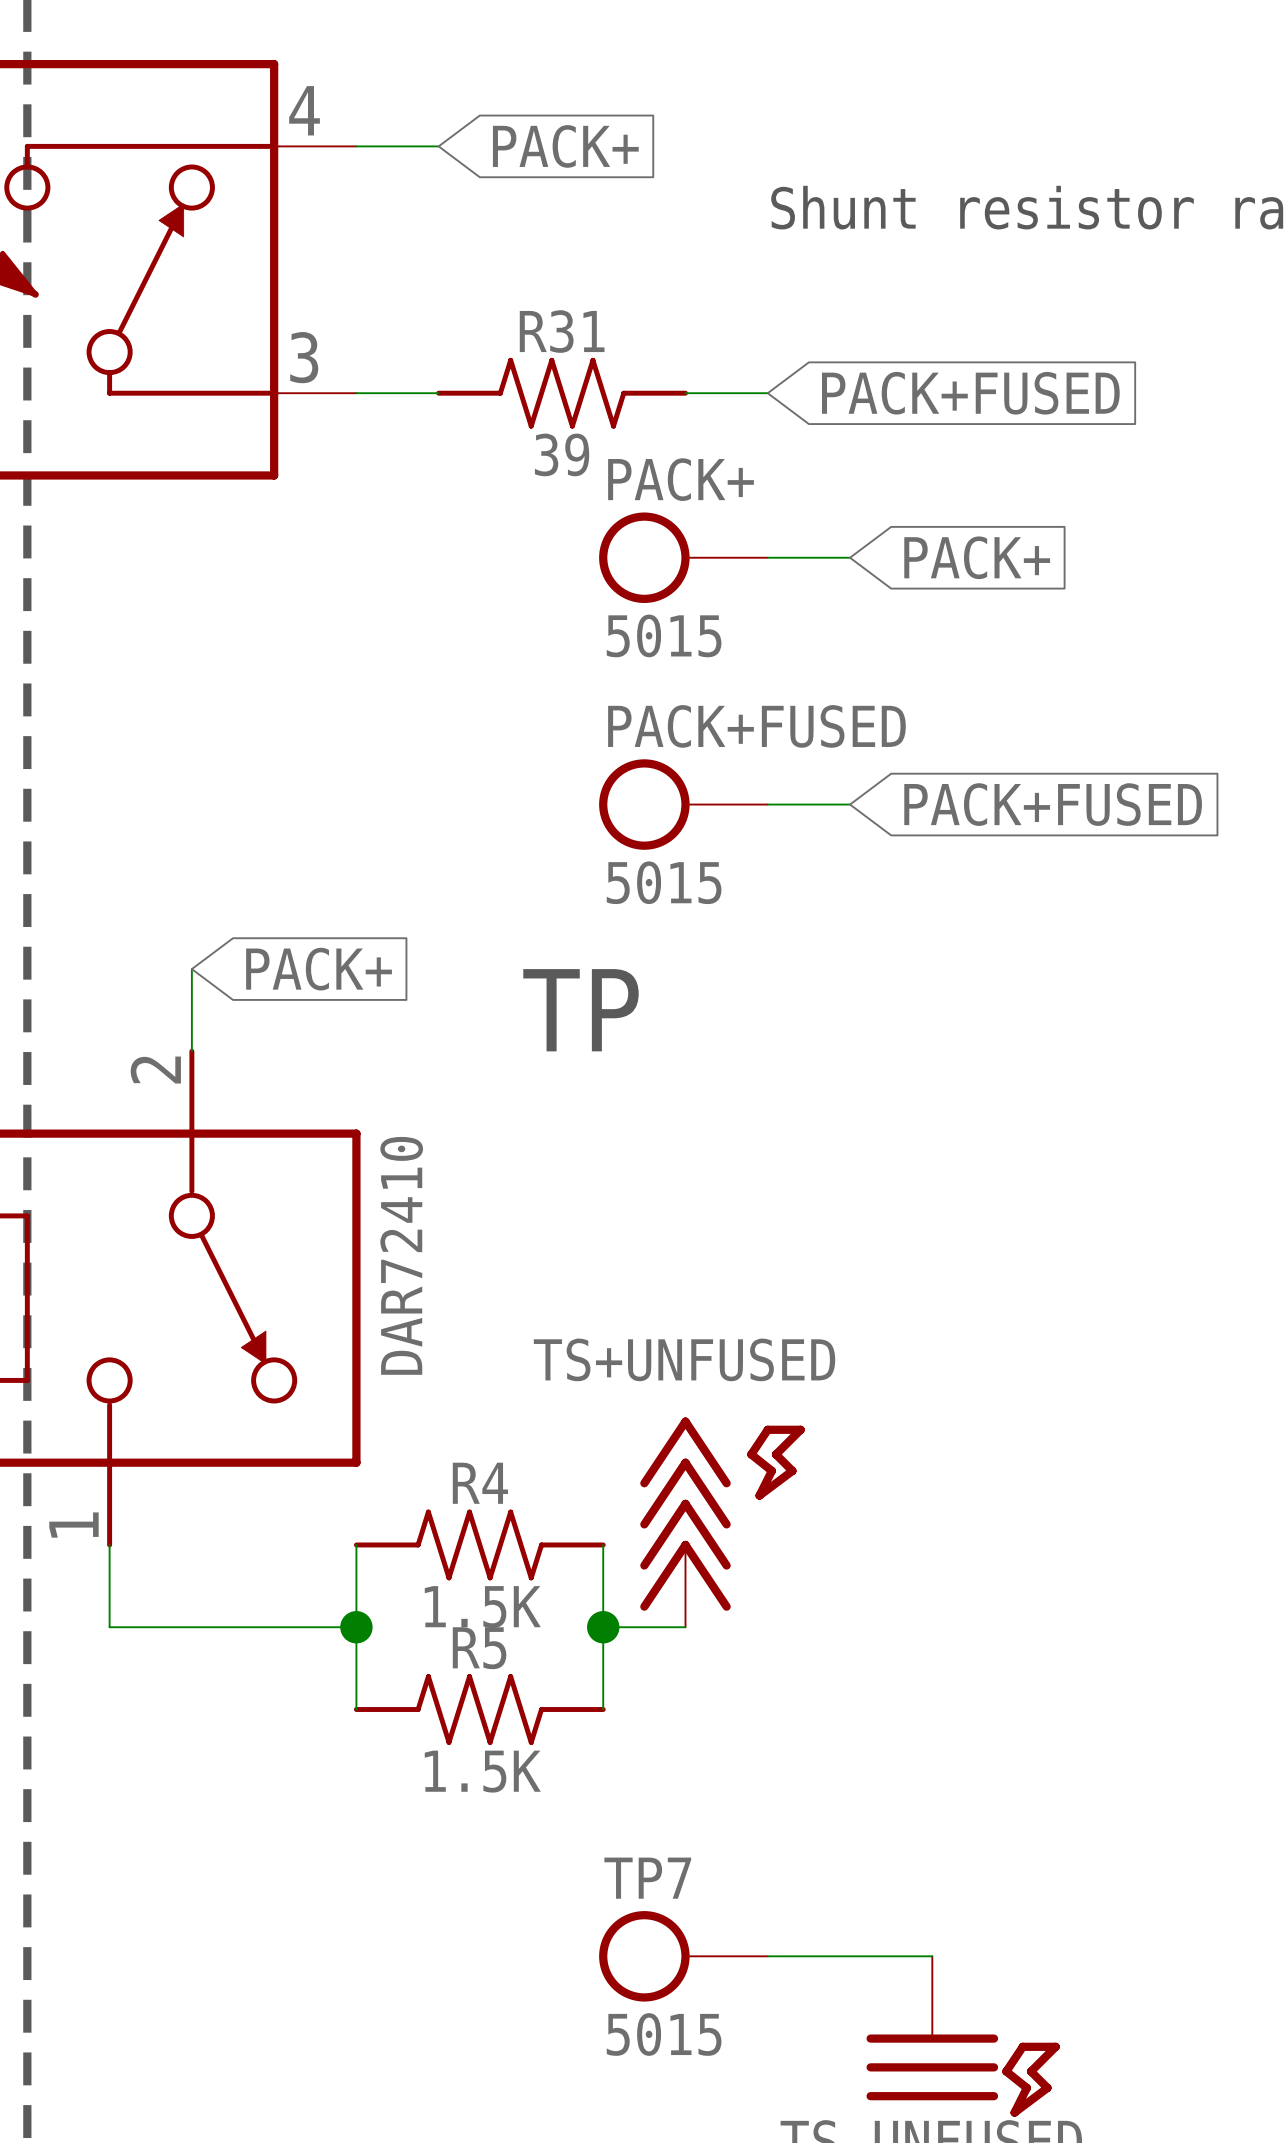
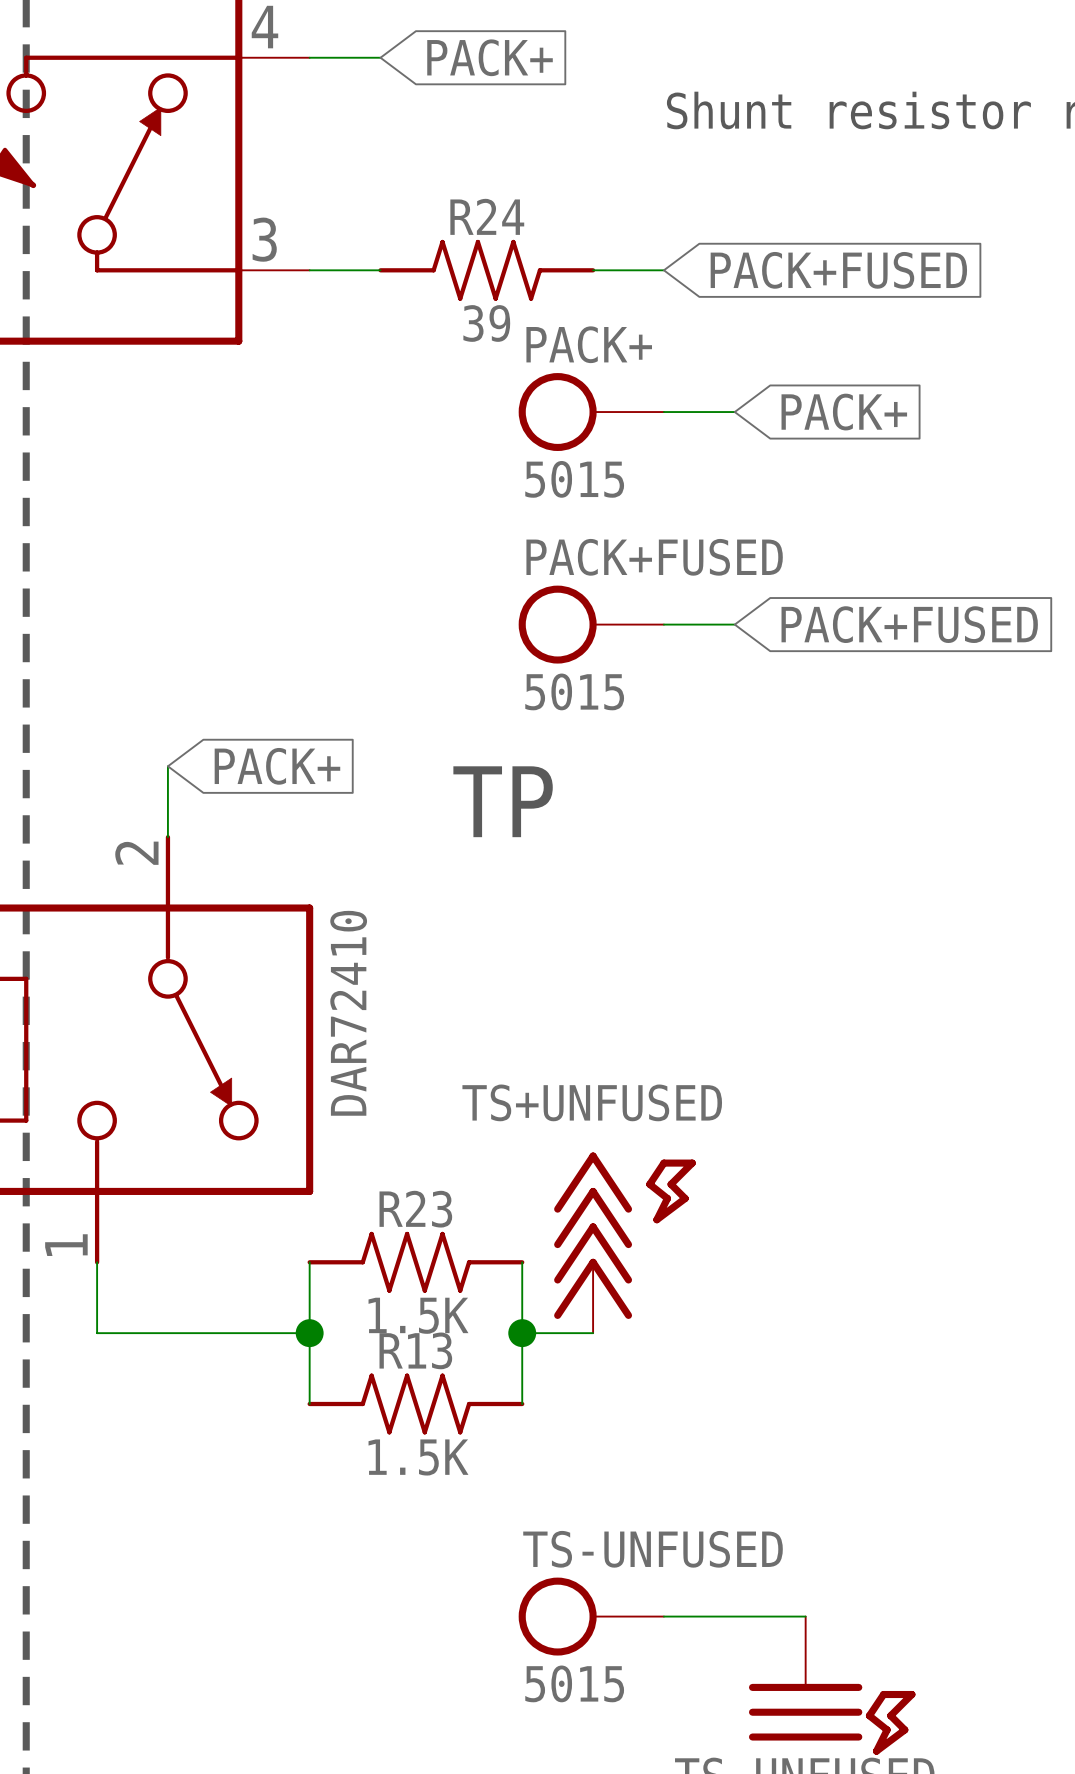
R31 name: R31 (562, 331) -> R24 (487, 216)
R4 name: R4 (480, 1483) -> R23 (415, 1209)
R5 name: R5 (479, 1648) -> R13 (415, 1350)
TP7 name: TP7 (647, 1878) -> TS-UNFUSED (653, 1549)

